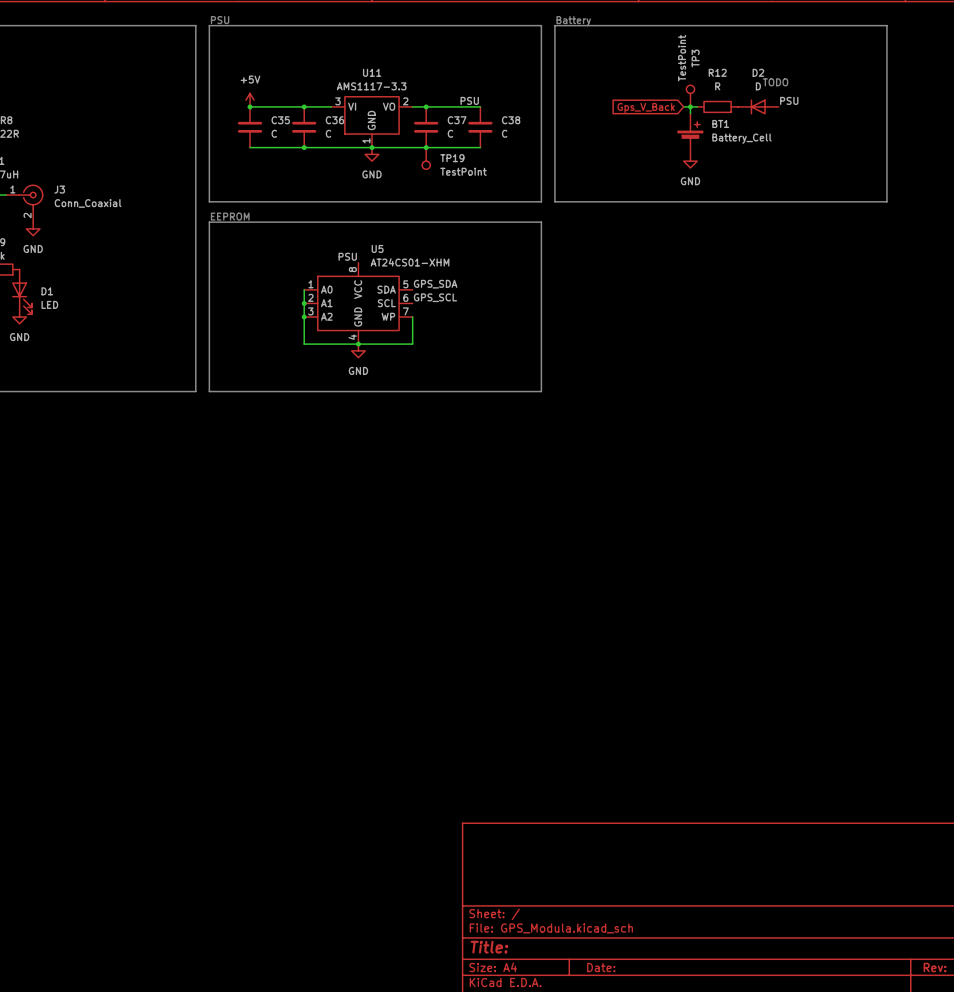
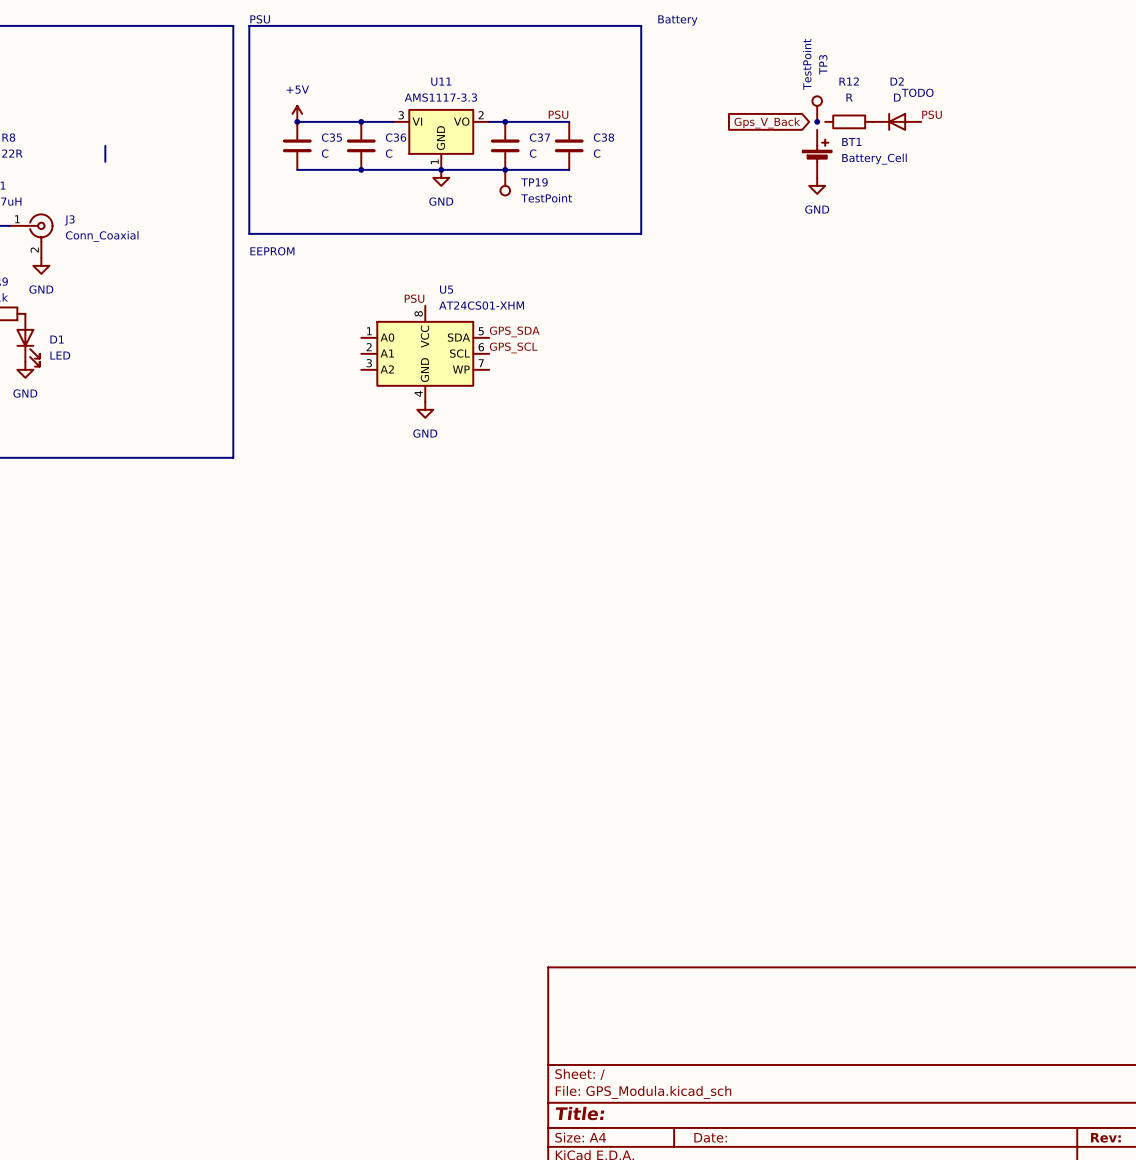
line: (554, 25) (554, 201) (886, 201) (886, 25) (554, 25) -> none
wire: (683, 106) (697, 106) -> none
wire: (690, 106) (690, 113) -> none
wire: none -> (105, 145) (105, 161)
line: (209, 222) (209, 391) (541, 391) (541, 222) (209, 222) -> none
wire: (304, 289) (304, 344) (412, 344) (412, 317) -> none
junction: (304, 303) -> none
junction: (304, 317) -> none
junction: (358, 344) -> none

